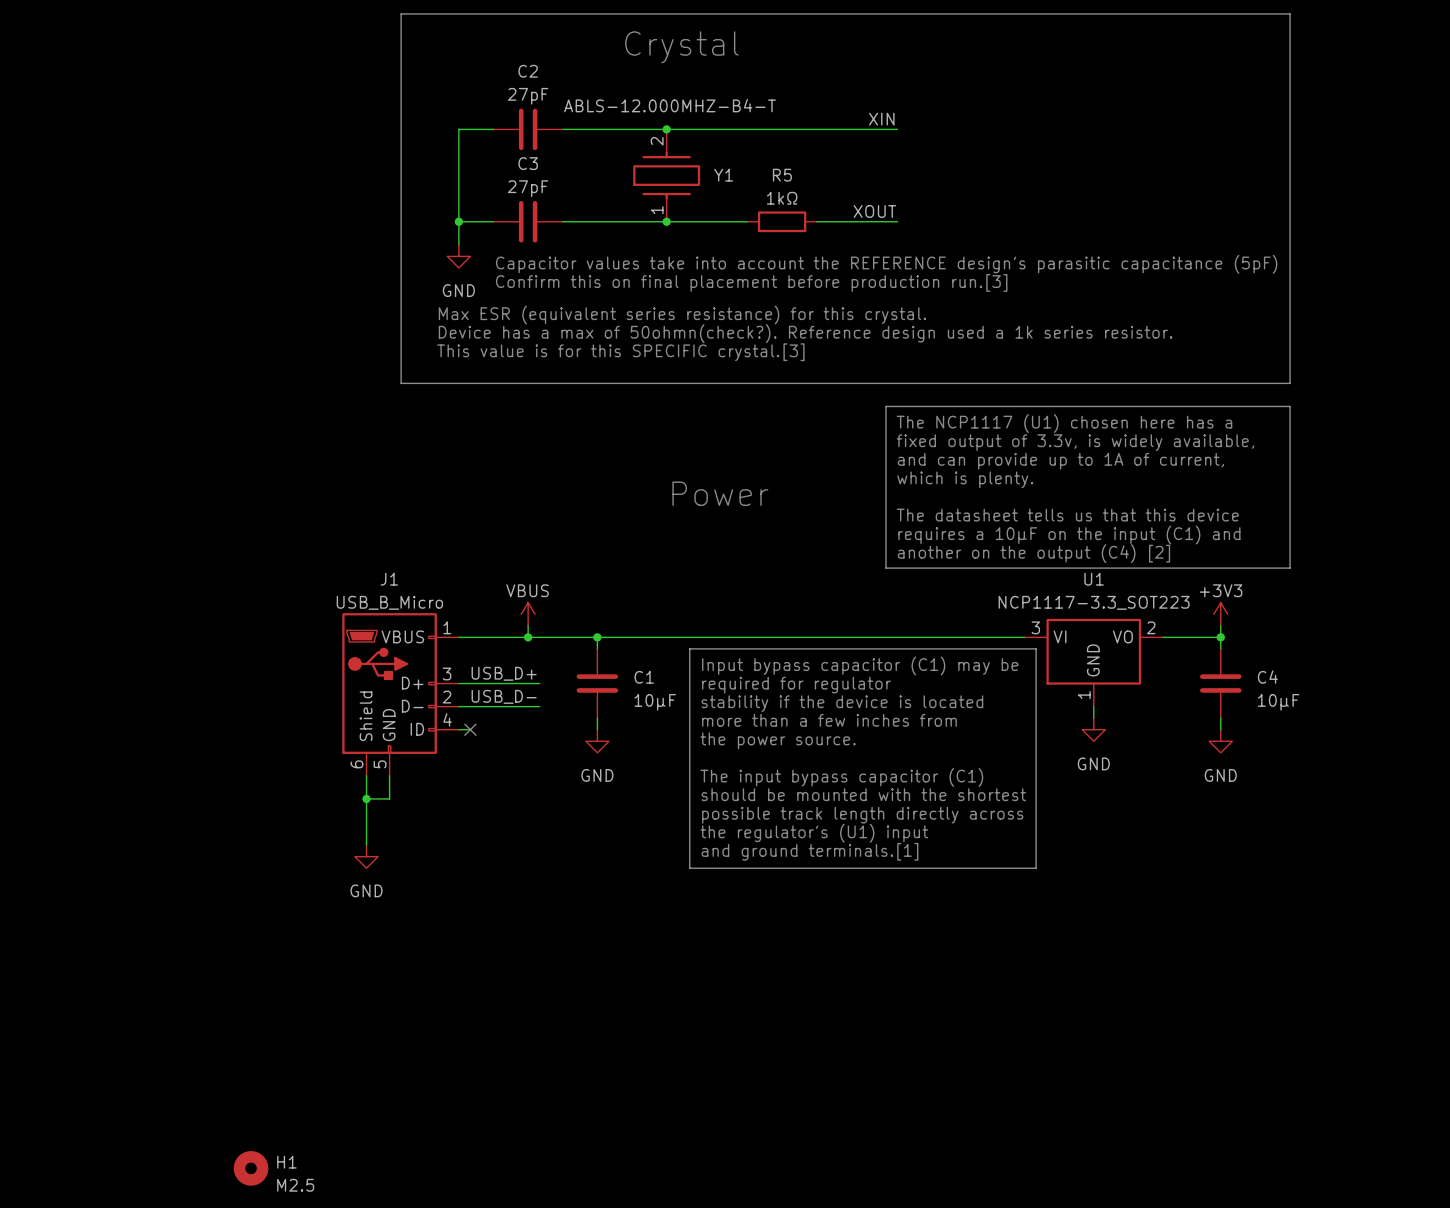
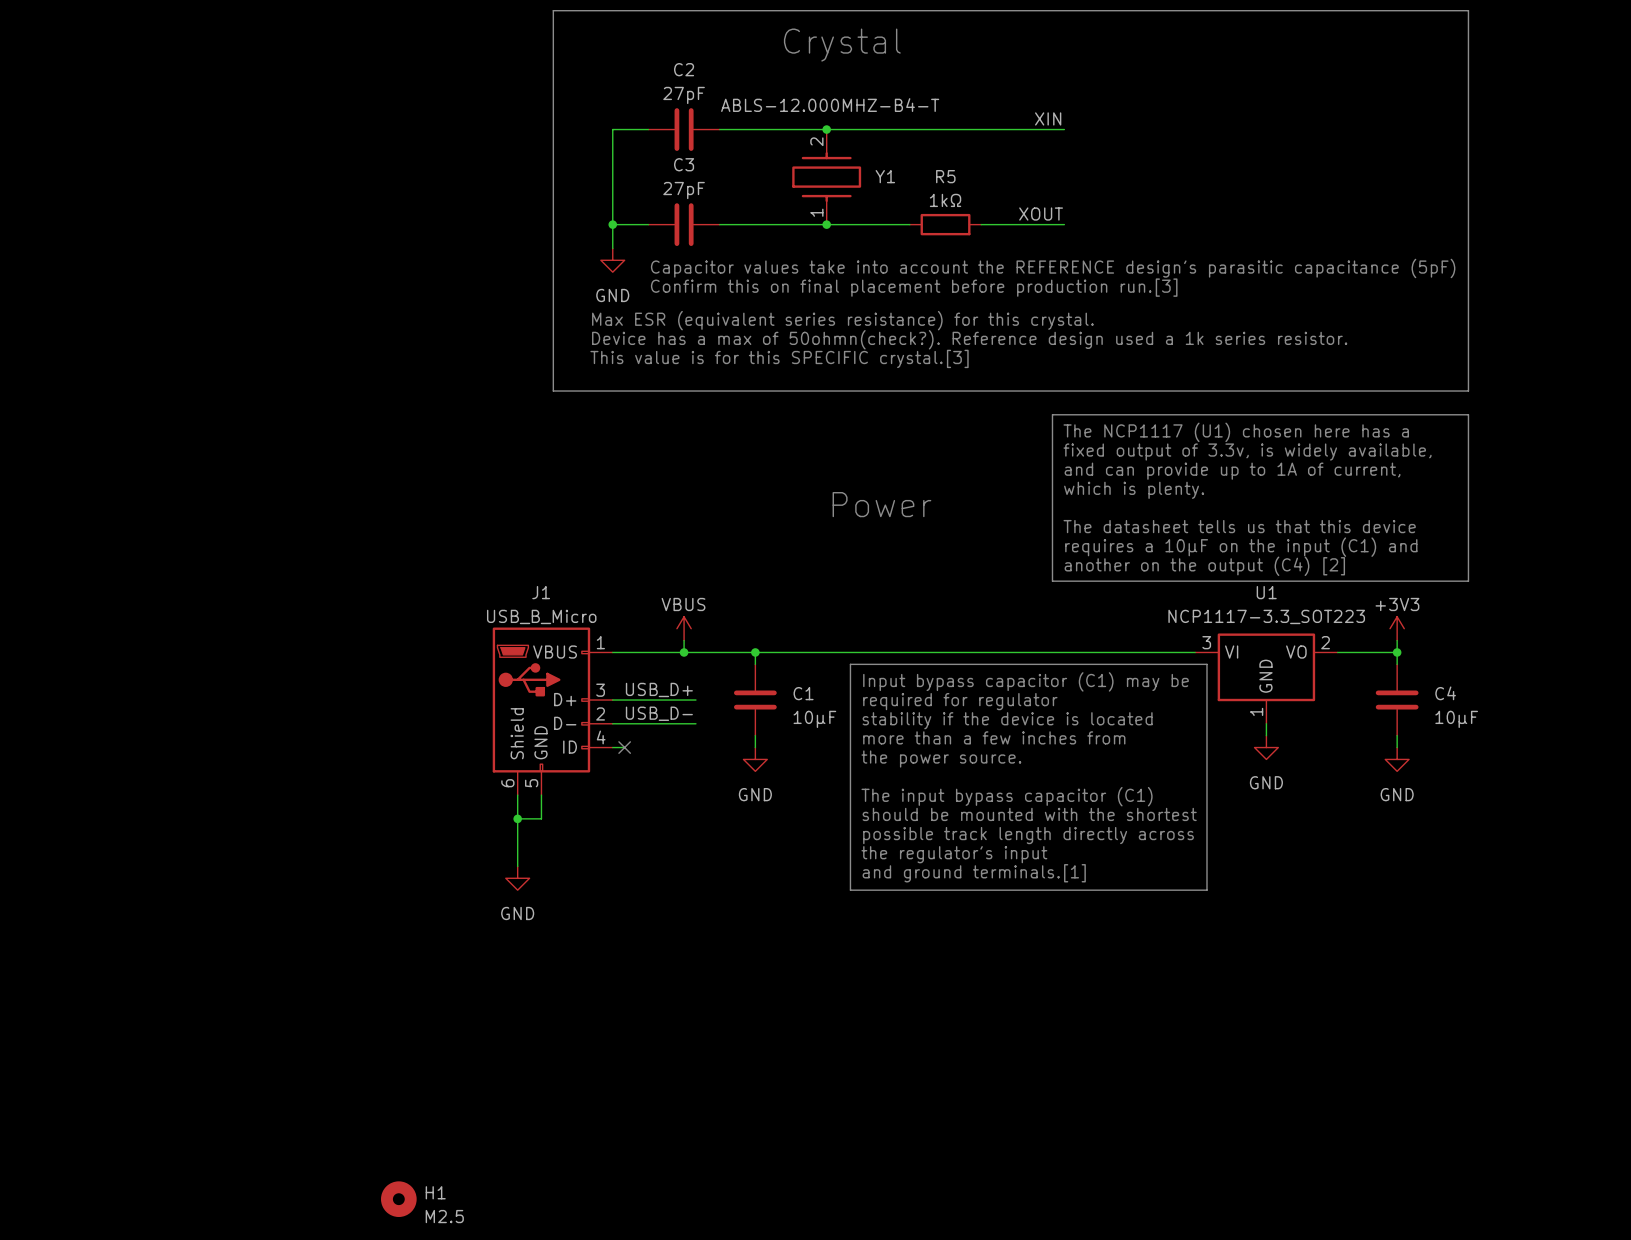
text: the regulator's (U1) input (814, 833) -> the regulator's input (954, 854)

